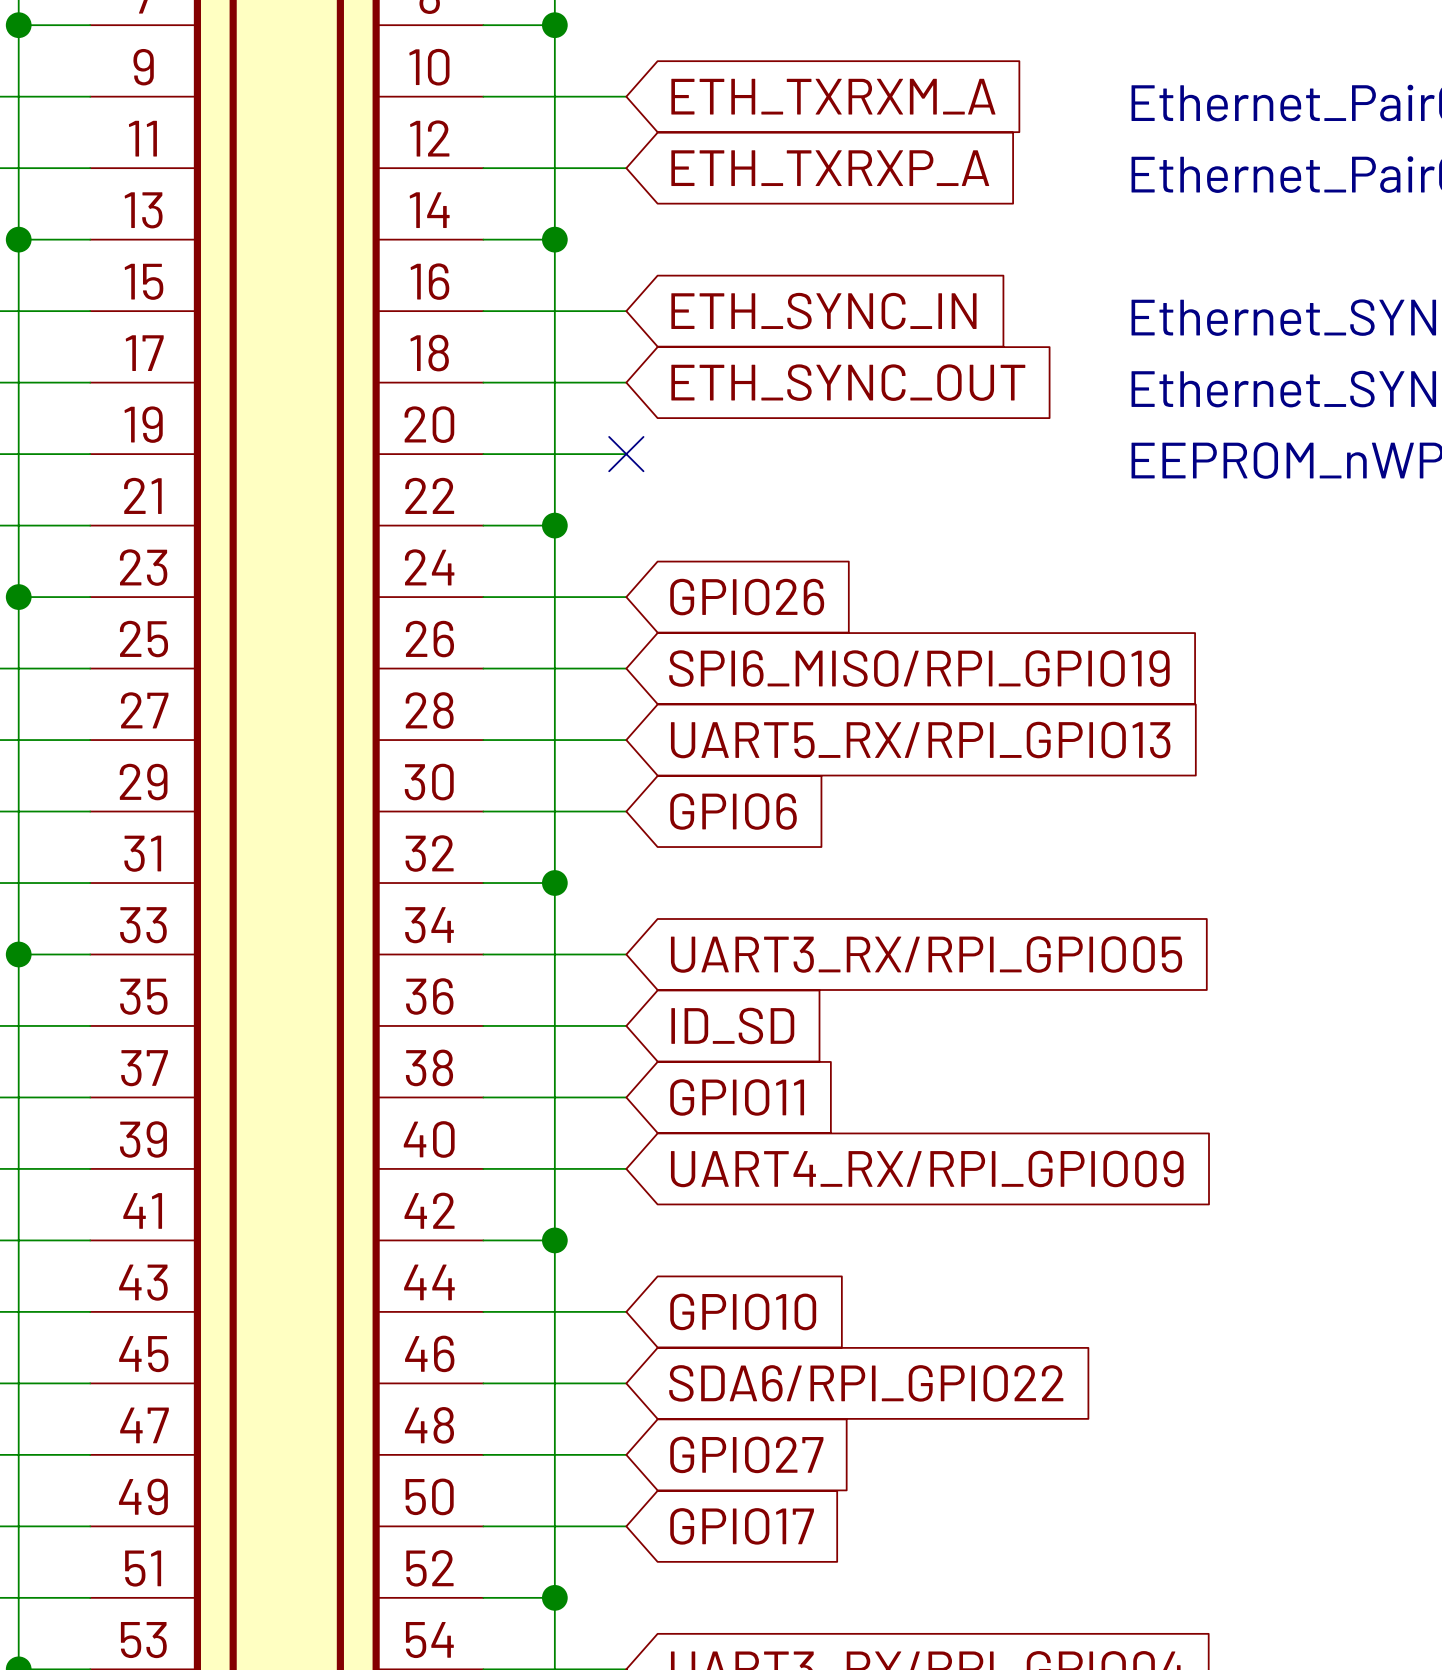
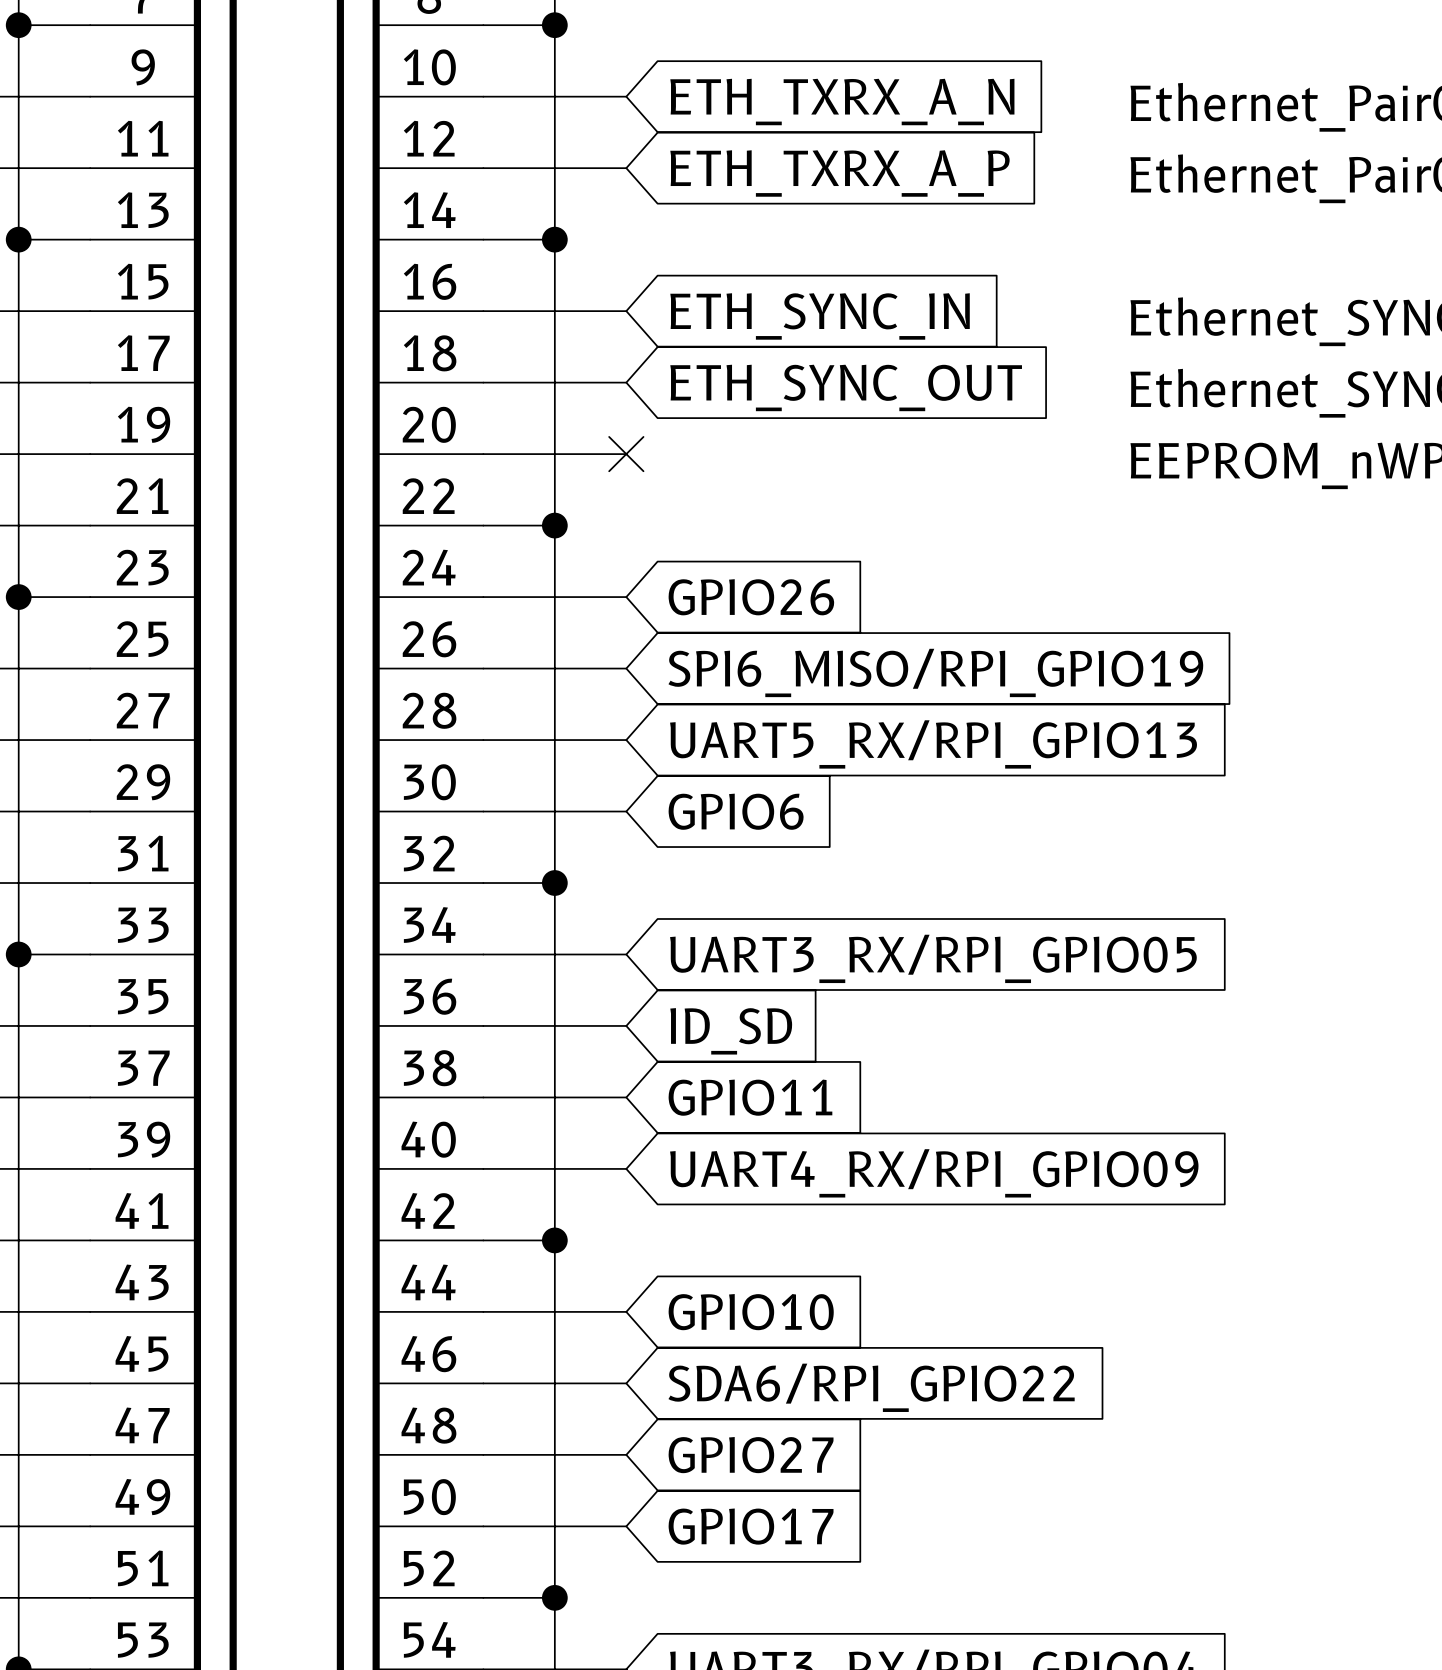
global label: ETH_TXRXM_A (833, 96) -> ETH_TXRX_A_N (842, 102)
global label: ETH_TXRXP_A (830, 168) -> ETH_TXRX_A_P (839, 173)

